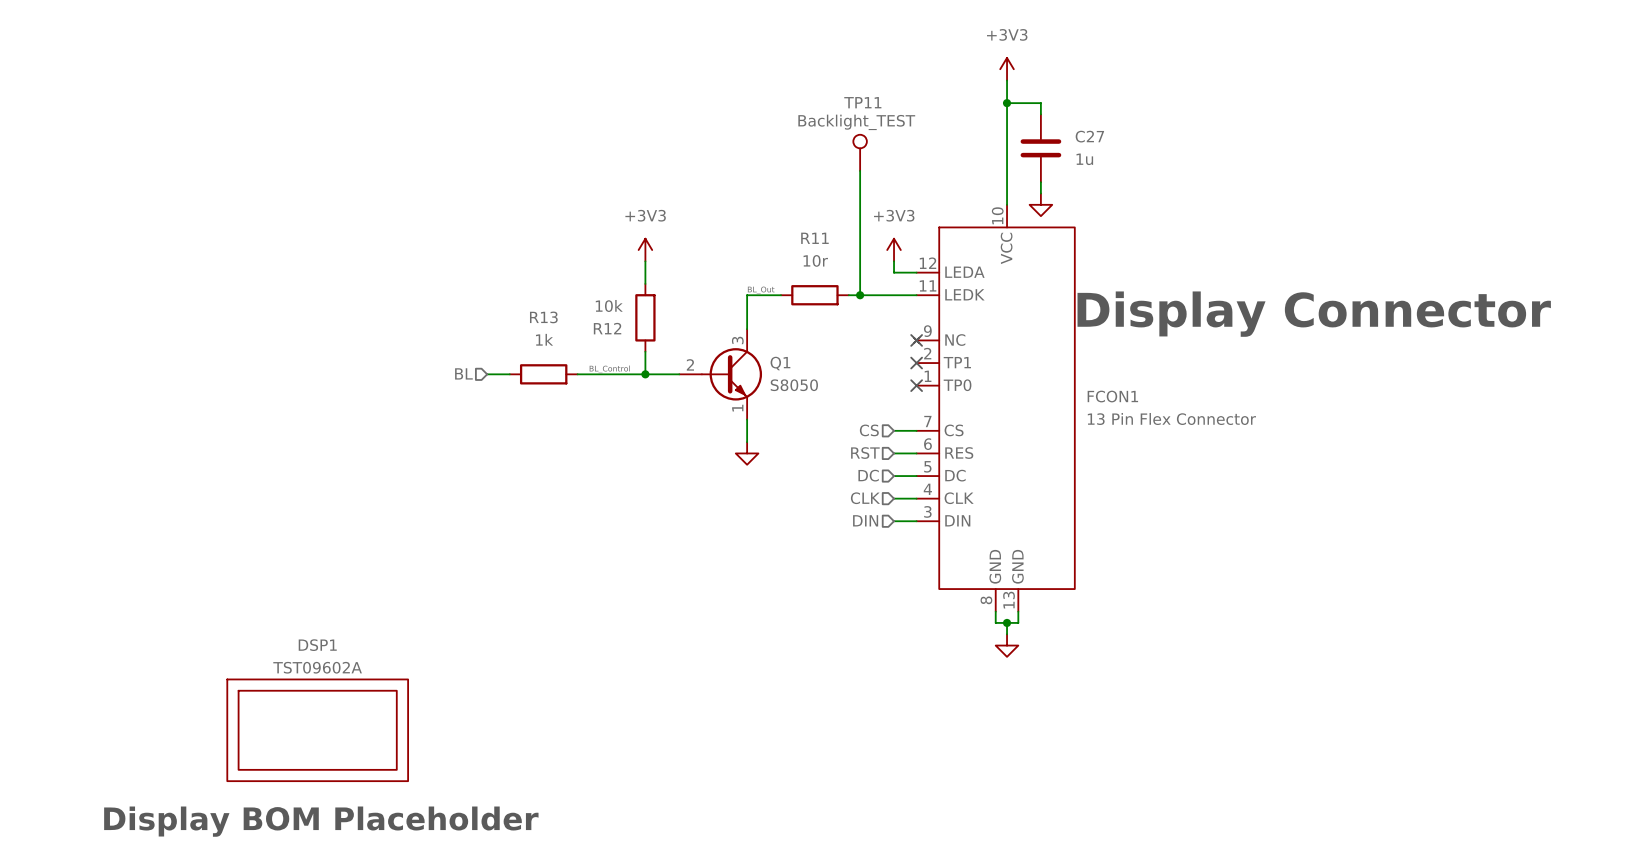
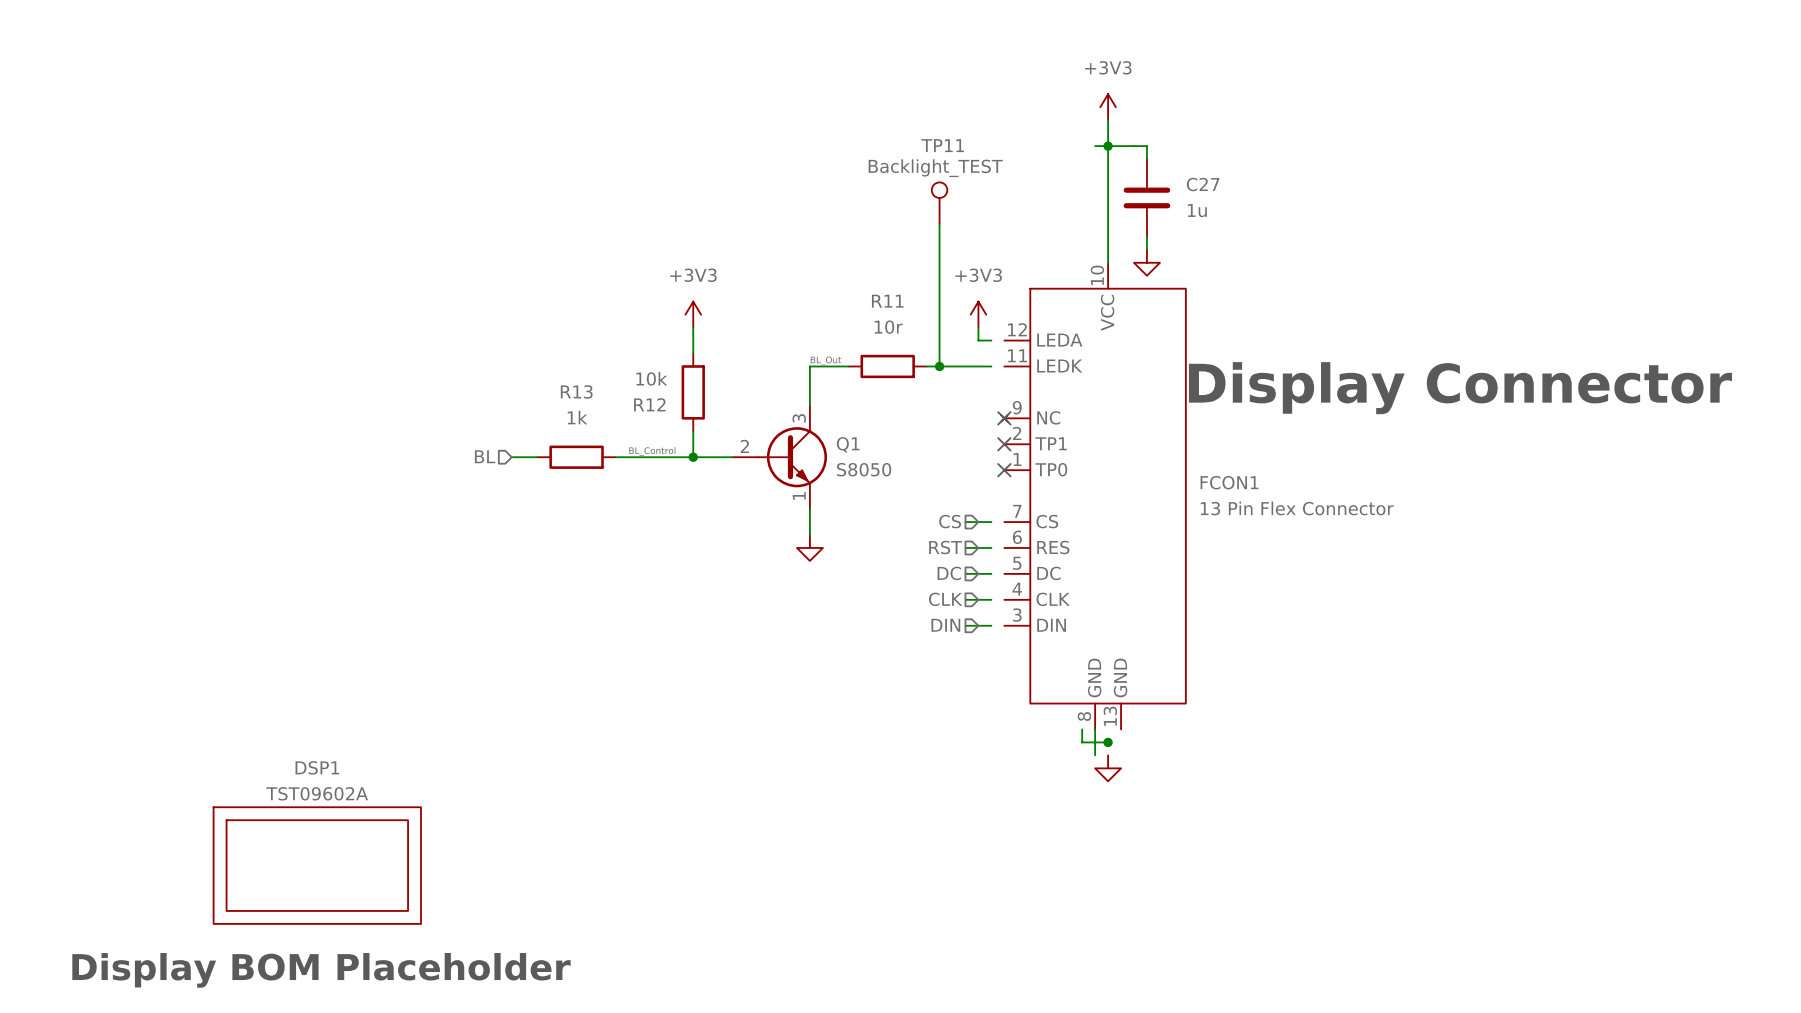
wire: (905, 272) (916, 272) -> (1095, 146) (1108, 146)
wire: (905, 295) (916, 295) -> none
wire: (905, 430) (916, 430) -> (965, 522) (978, 522)
wire: (905, 453) (916, 453) -> (965, 547) (978, 547)
wire: (905, 476) (916, 476) -> (965, 573) (978, 573)
wire: (905, 498) (916, 498) -> (965, 599) (978, 599)
wire: (905, 521) (916, 521) -> (965, 625) (978, 625)
wire: none -> (1082, 729) (1082, 742) (1095, 742) (1095, 755)
wire: (1018, 611) (1018, 622) (1007, 622) (1007, 634) -> none

